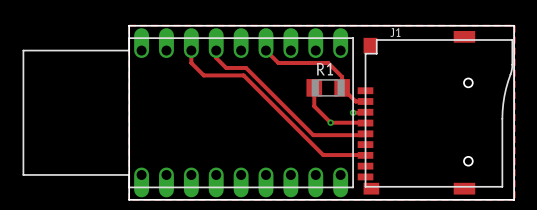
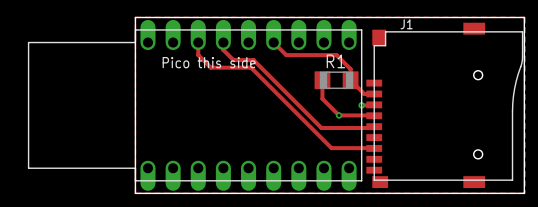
text: none -> Pico this side (209, 62)

